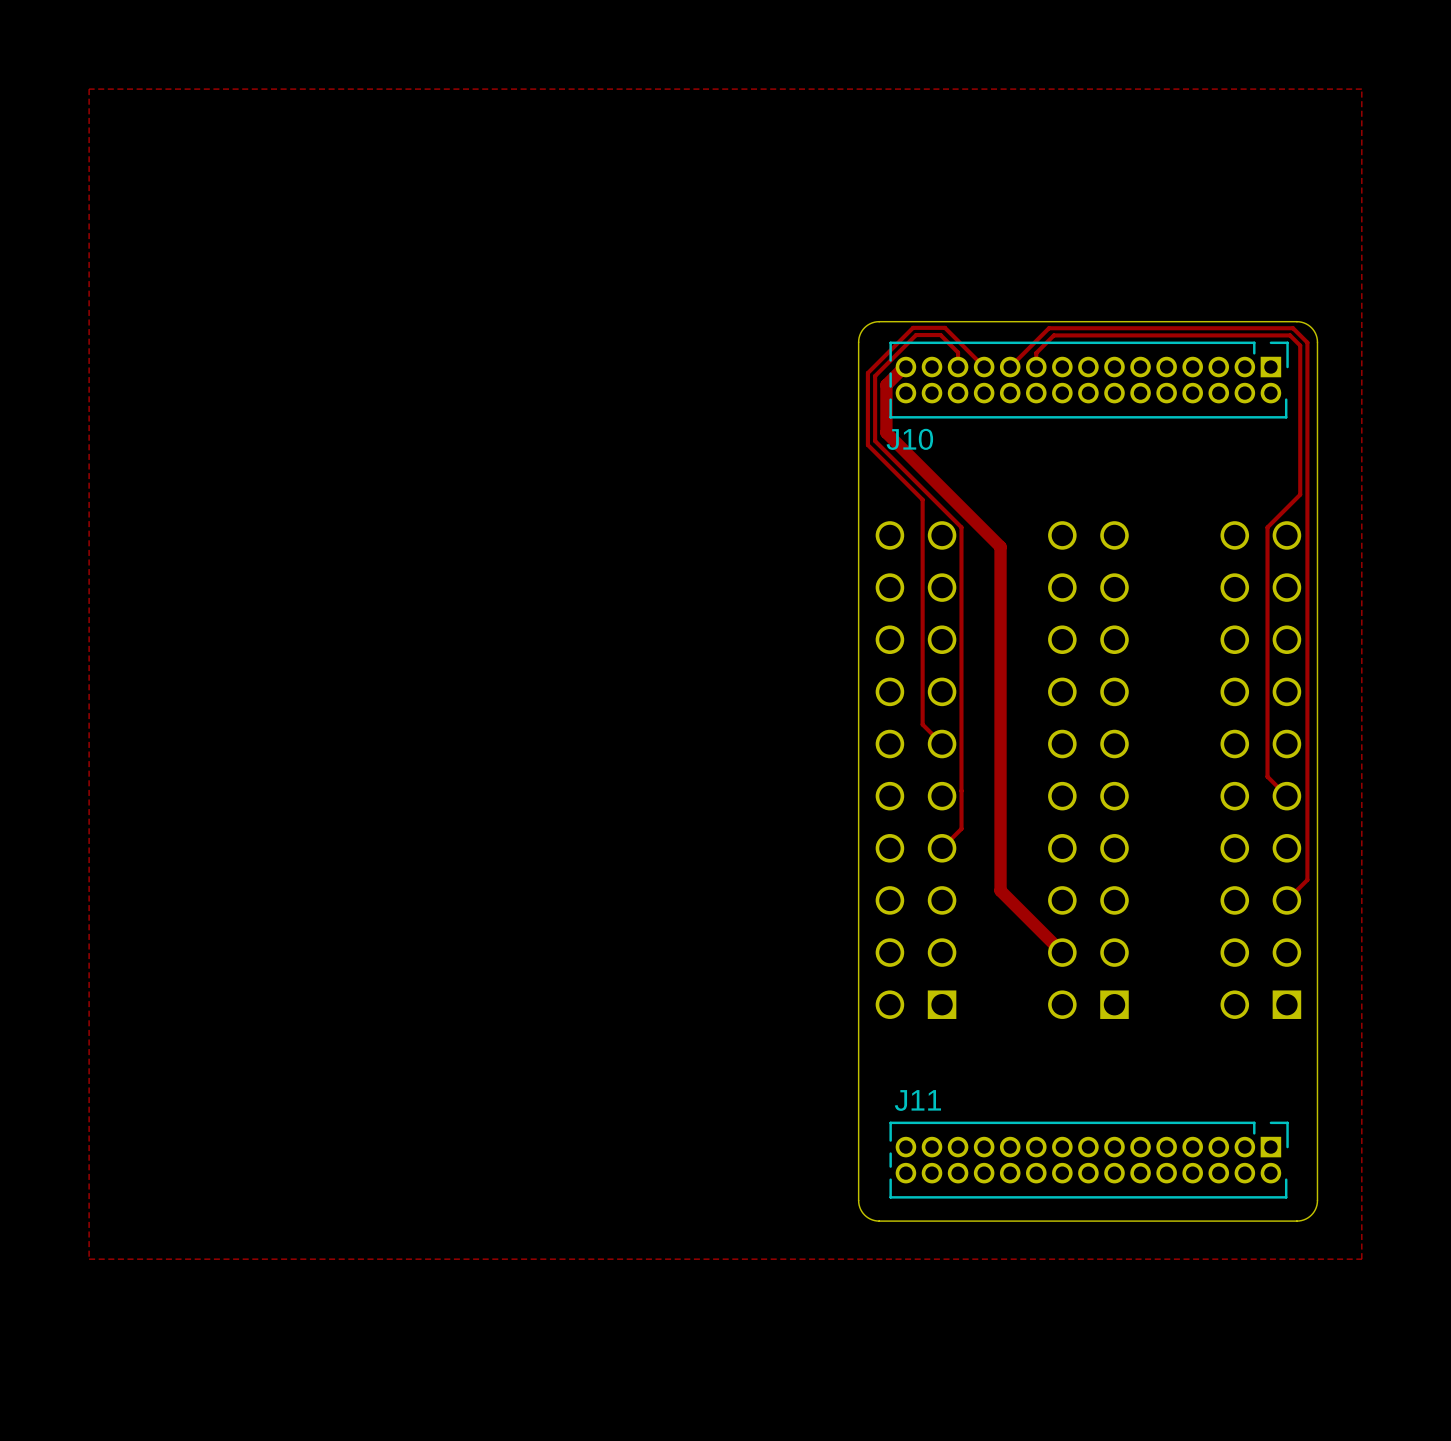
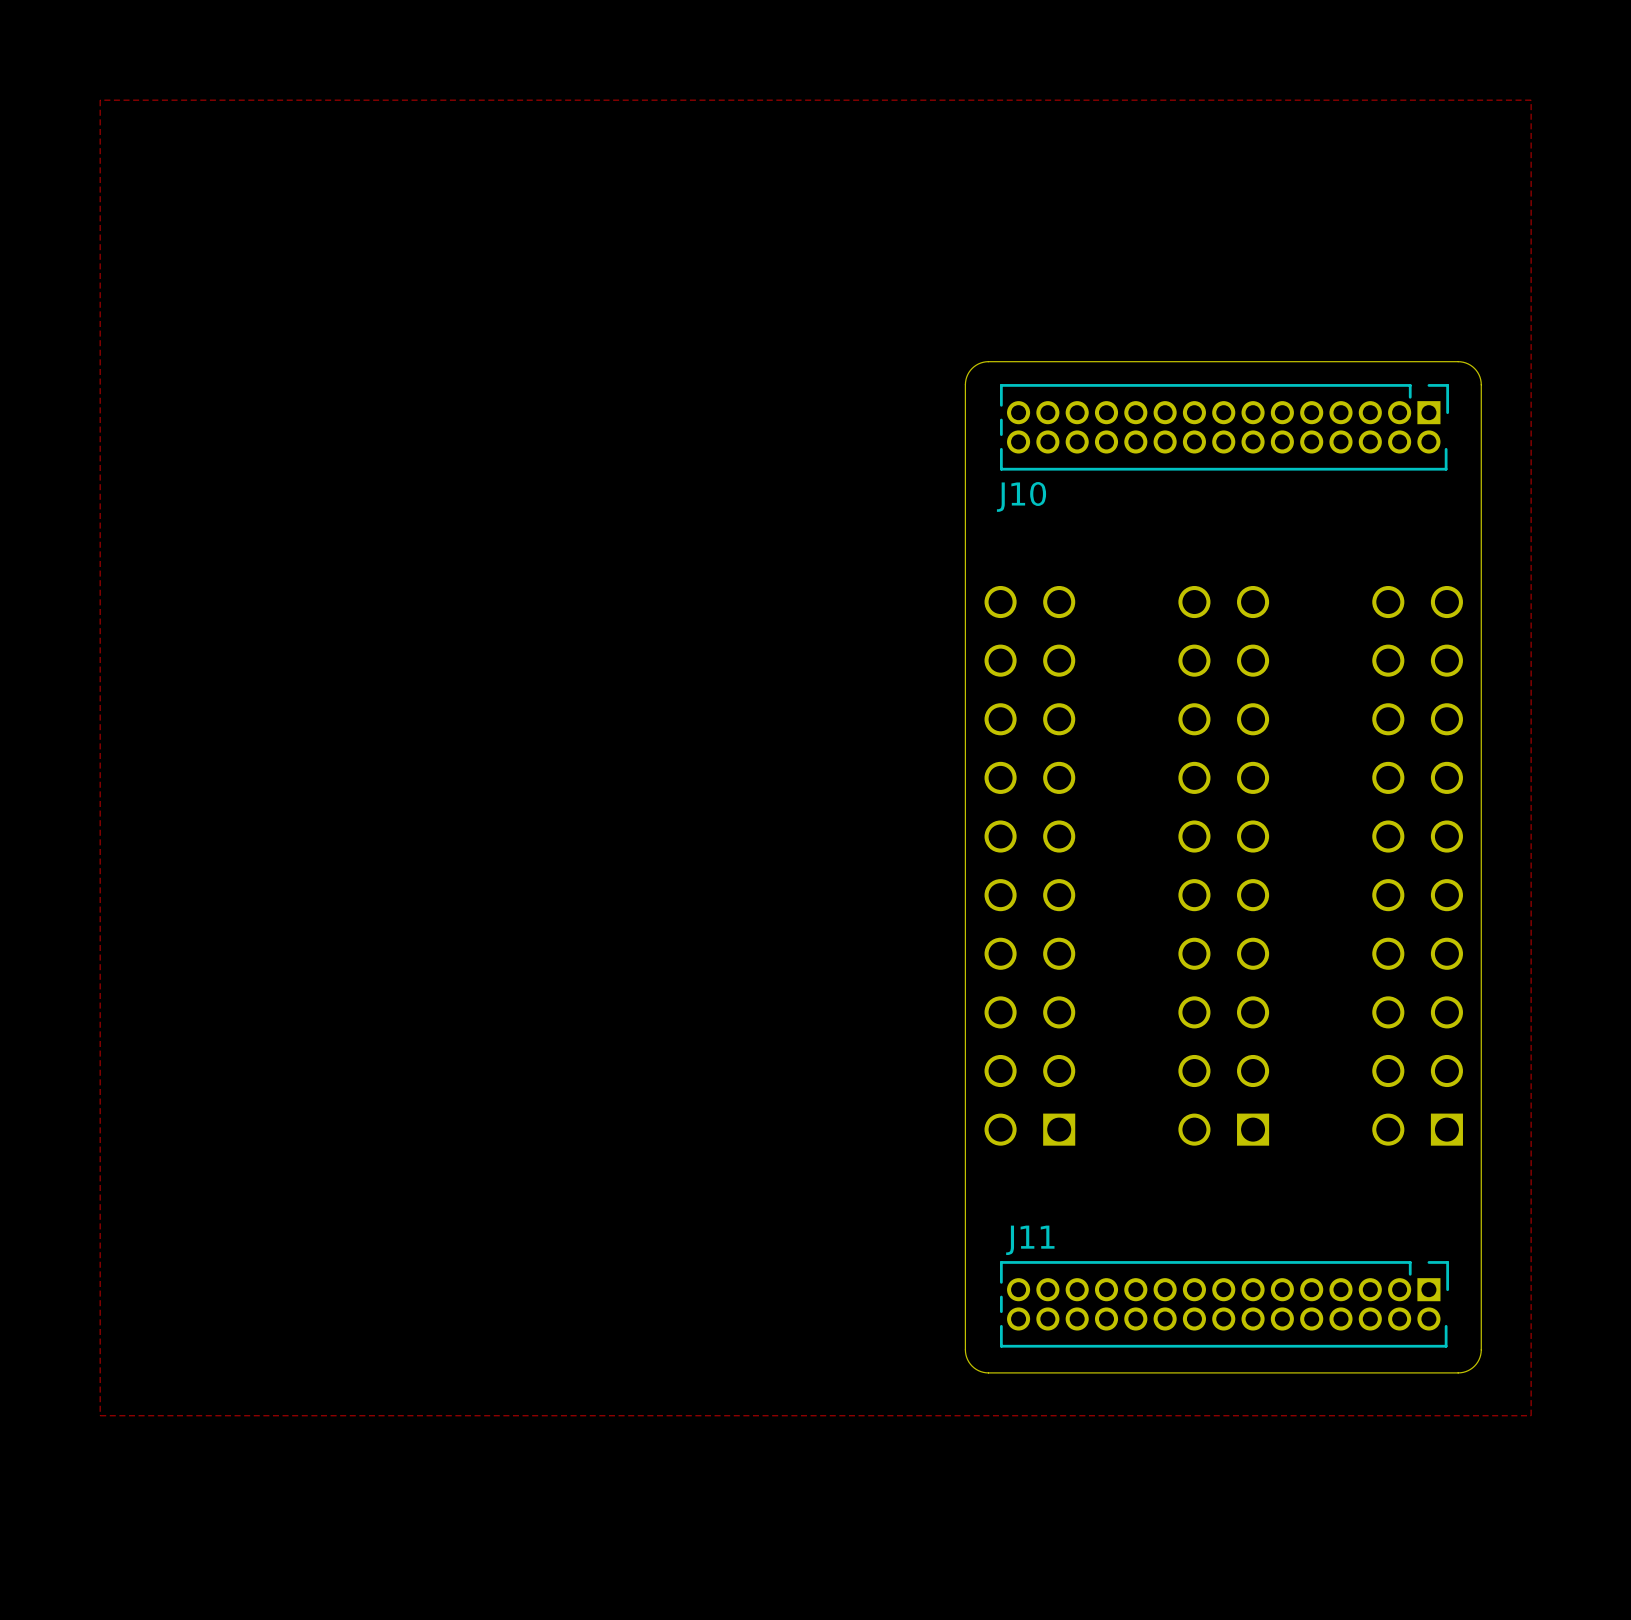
track: (905, 367) (886, 385) (886, 432) (1000, 546) (1000, 890) (1062, 952) -> none
track: (958, 367) (958, 352) (940, 335) (916, 335) (875, 376) (875, 441) (961, 527) (961, 828) (942, 848) -> none
track: (984, 367) (944, 327) (913, 327) (867, 373) (867, 445) (922, 499) (922, 724) (942, 744) -> none
track: (1010, 367) (1048, 328) (1293, 328) (1307, 342) (1307, 879) (1286, 900) -> none
track: (1036, 367) (1036, 353) (1053, 335) (1290, 335) (1300, 345) (1300, 494) (1267, 527) (1267, 776) (1286, 796) -> none

